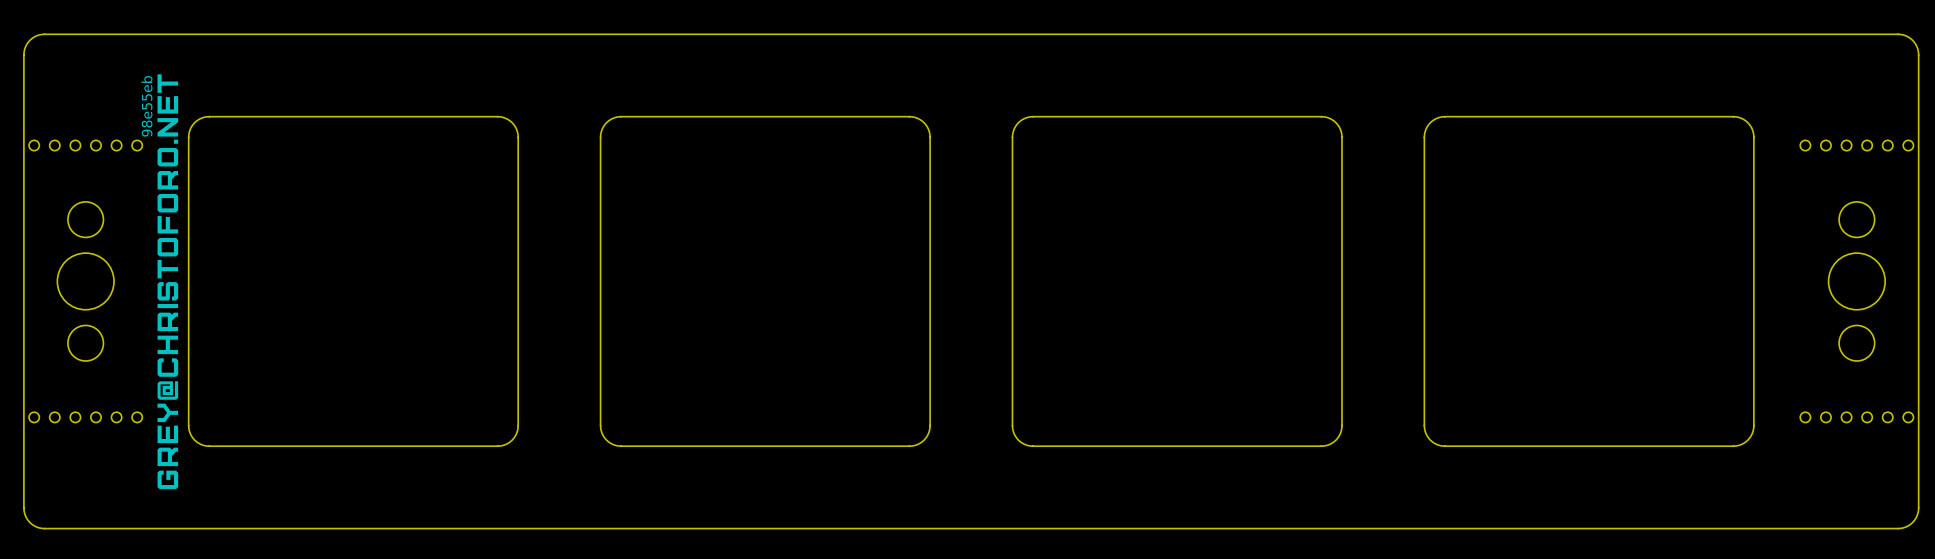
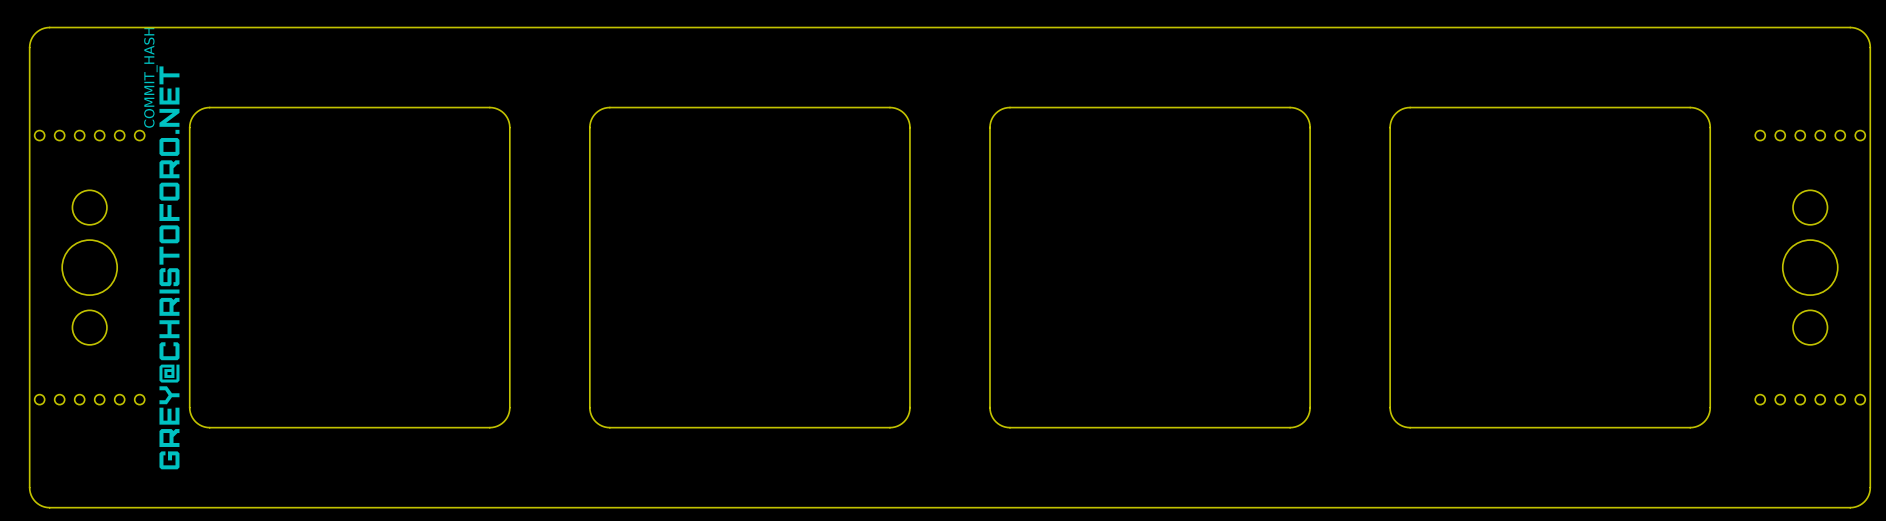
text: none -> COMMIT_HASH (150, 77)
text: 98e55eb (146, 106) -> none

